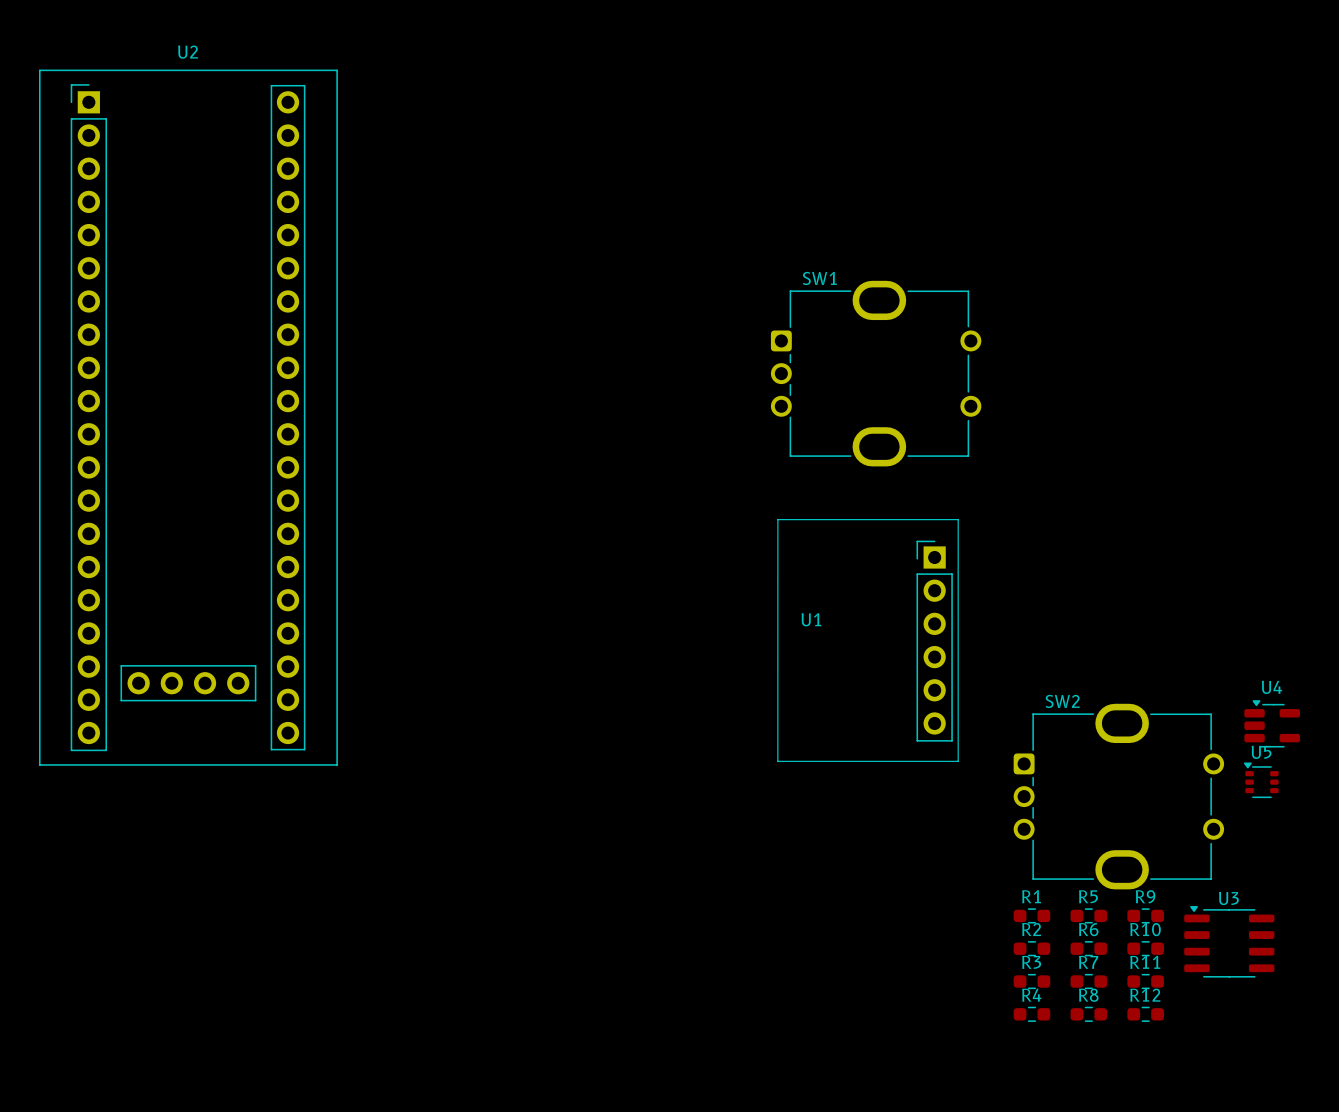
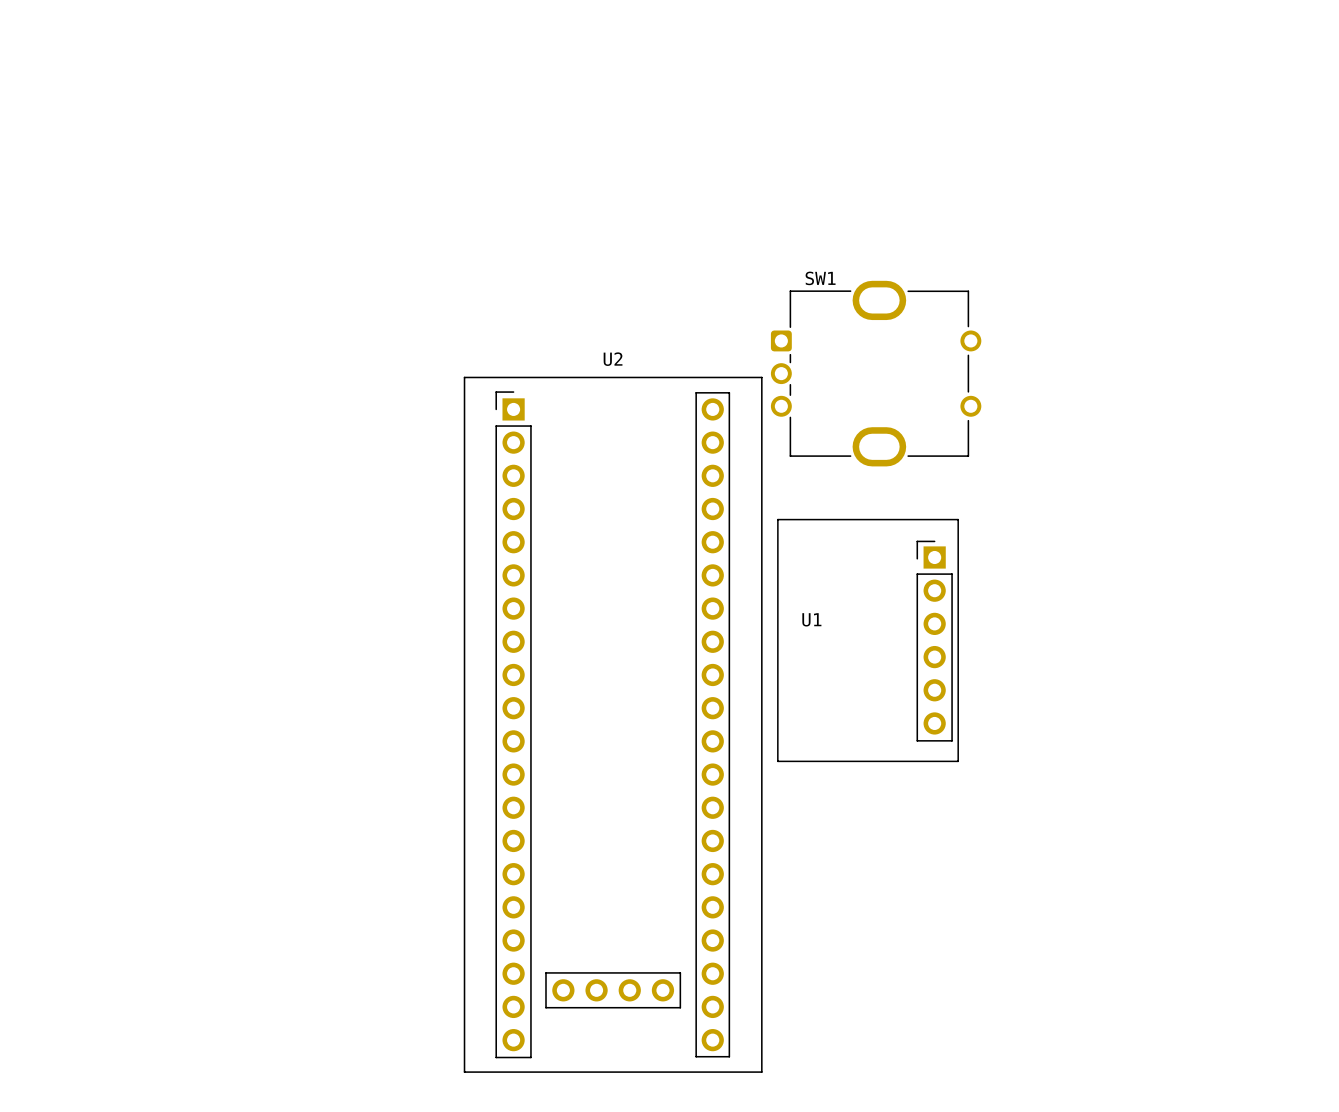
U2 position: (188, 417) -> (613, 724)
U4: (1272, 723) -> none
U5: (1261, 780) -> none
SW2: (1118, 796) -> none
R1: (1031, 915) -> none
R5: (1088, 915) -> none
R9: (1145, 915) -> none
U3: (1229, 941) -> none
R2: (1031, 948) -> none
R6: (1088, 948) -> none
R10: (1145, 948) -> none
R3: (1031, 981) -> none
R7: (1088, 981) -> none
R11: (1145, 981) -> none
R4: (1031, 1014) -> none
R8: (1088, 1014) -> none
R12: (1145, 1014) -> none

